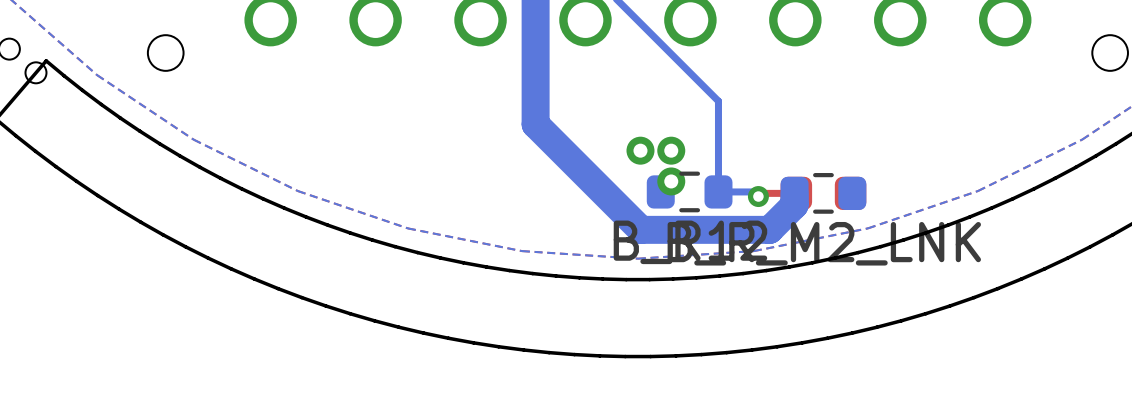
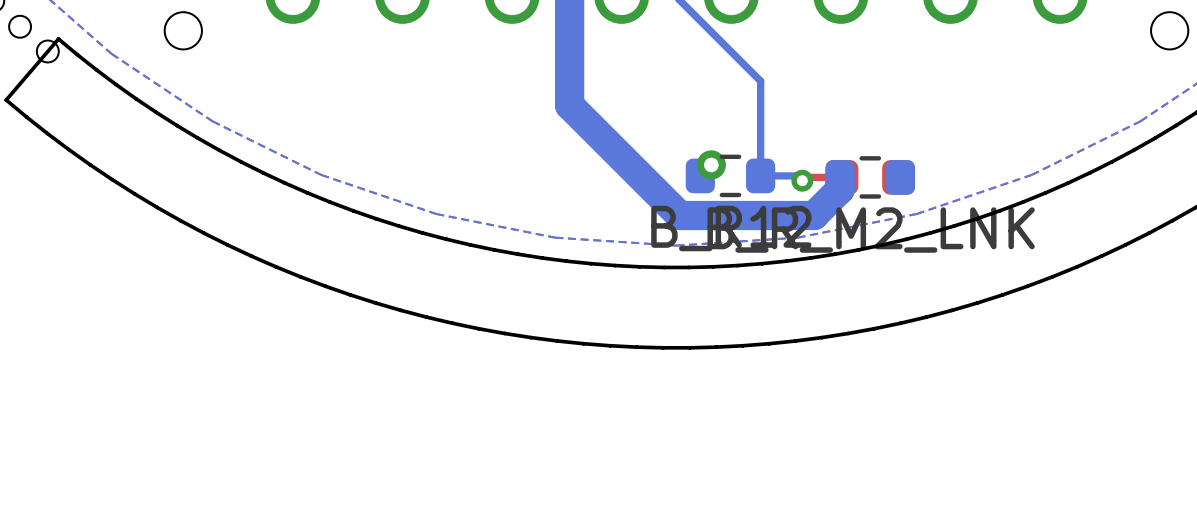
via: (640, 150) -> none
via: (671, 150) -> none

